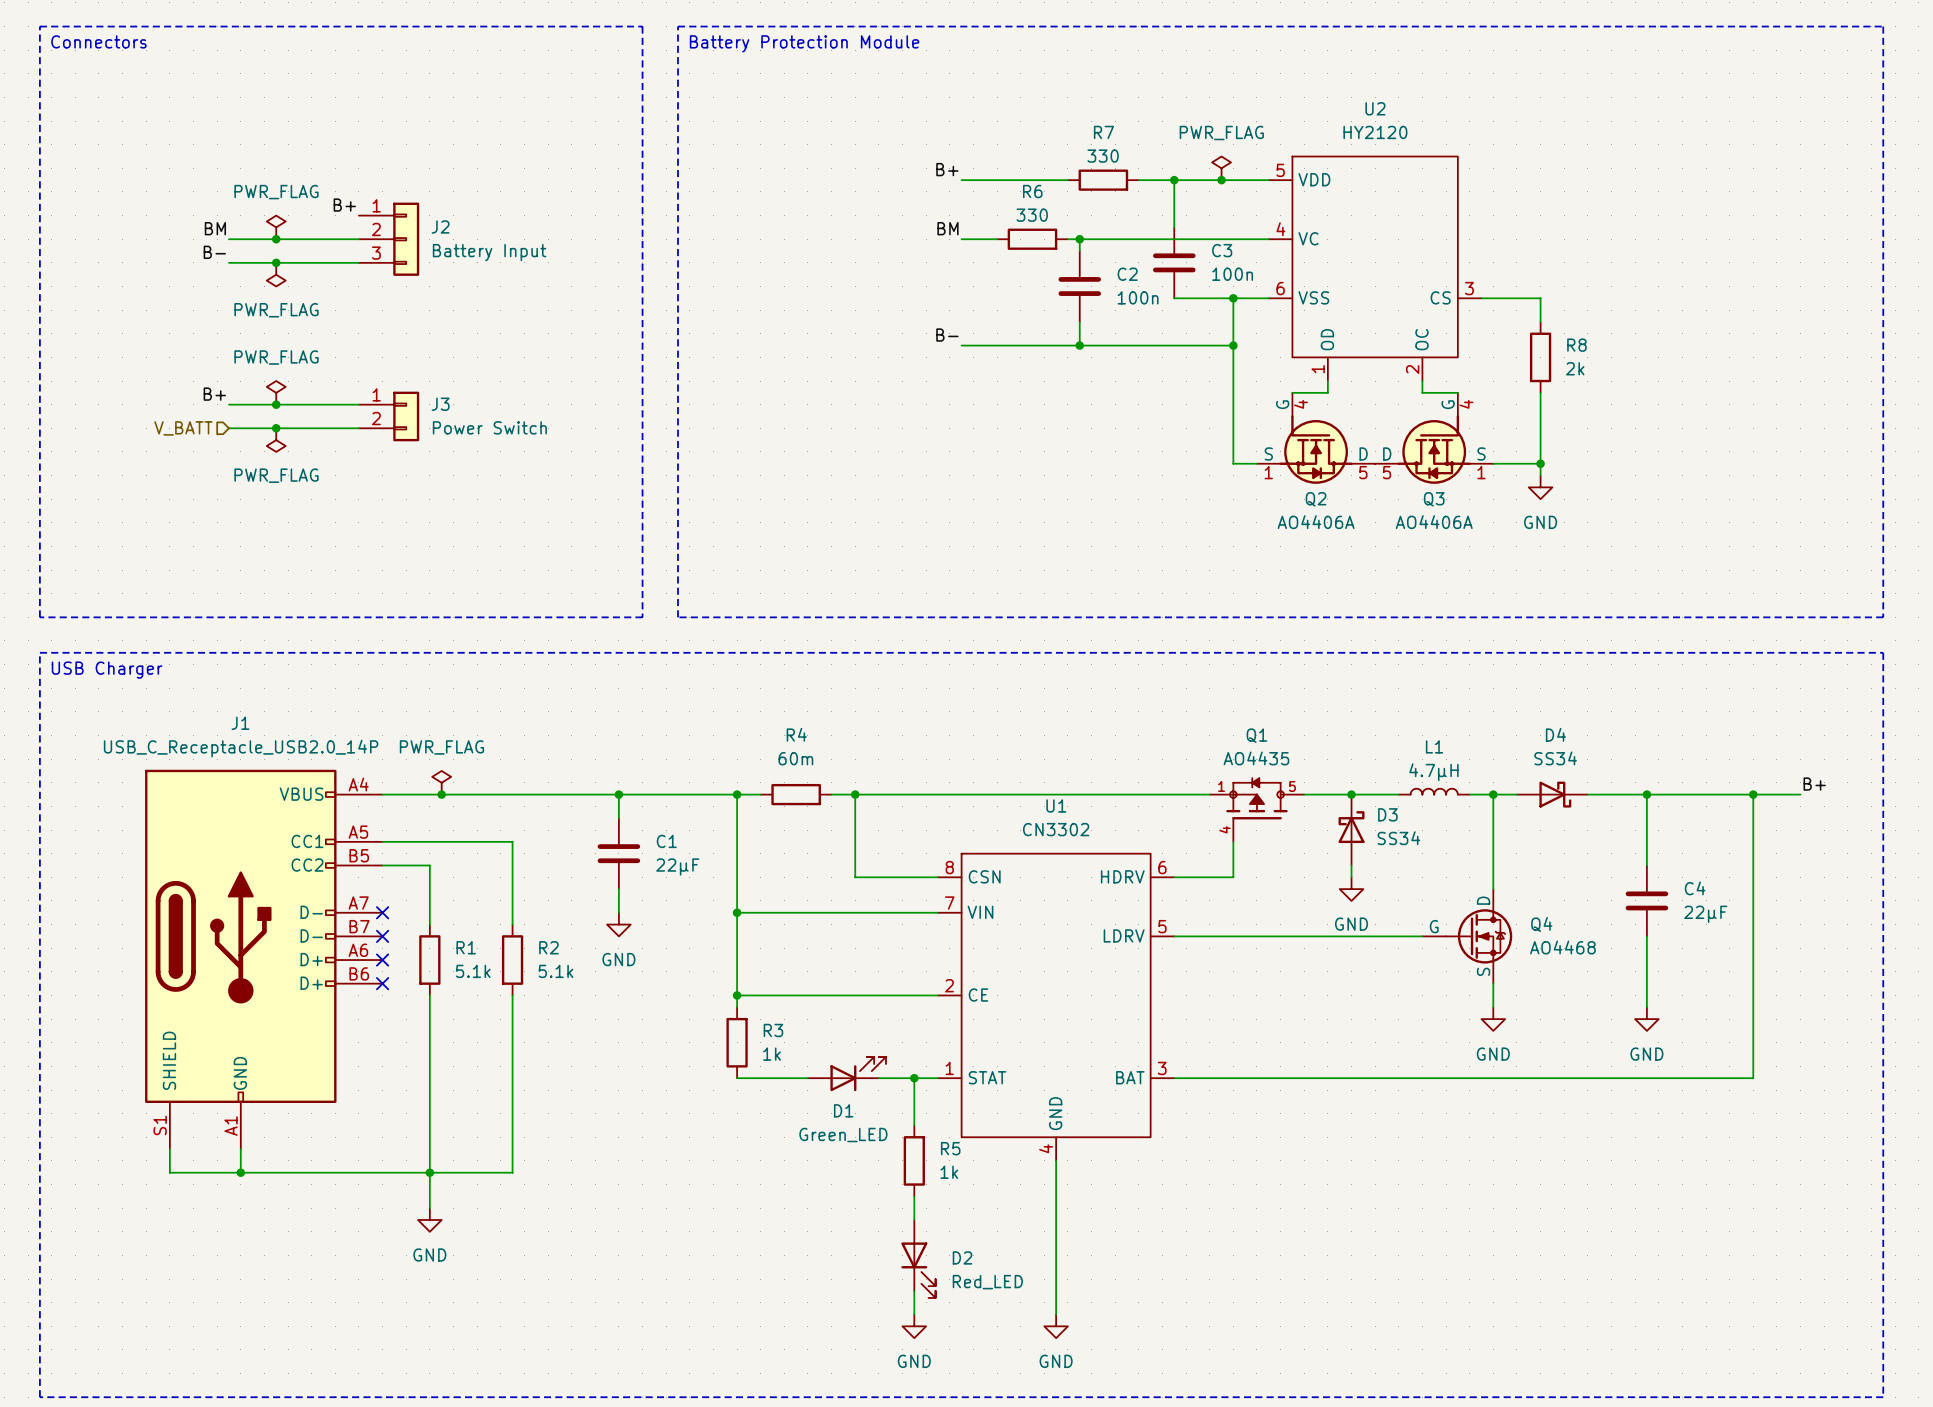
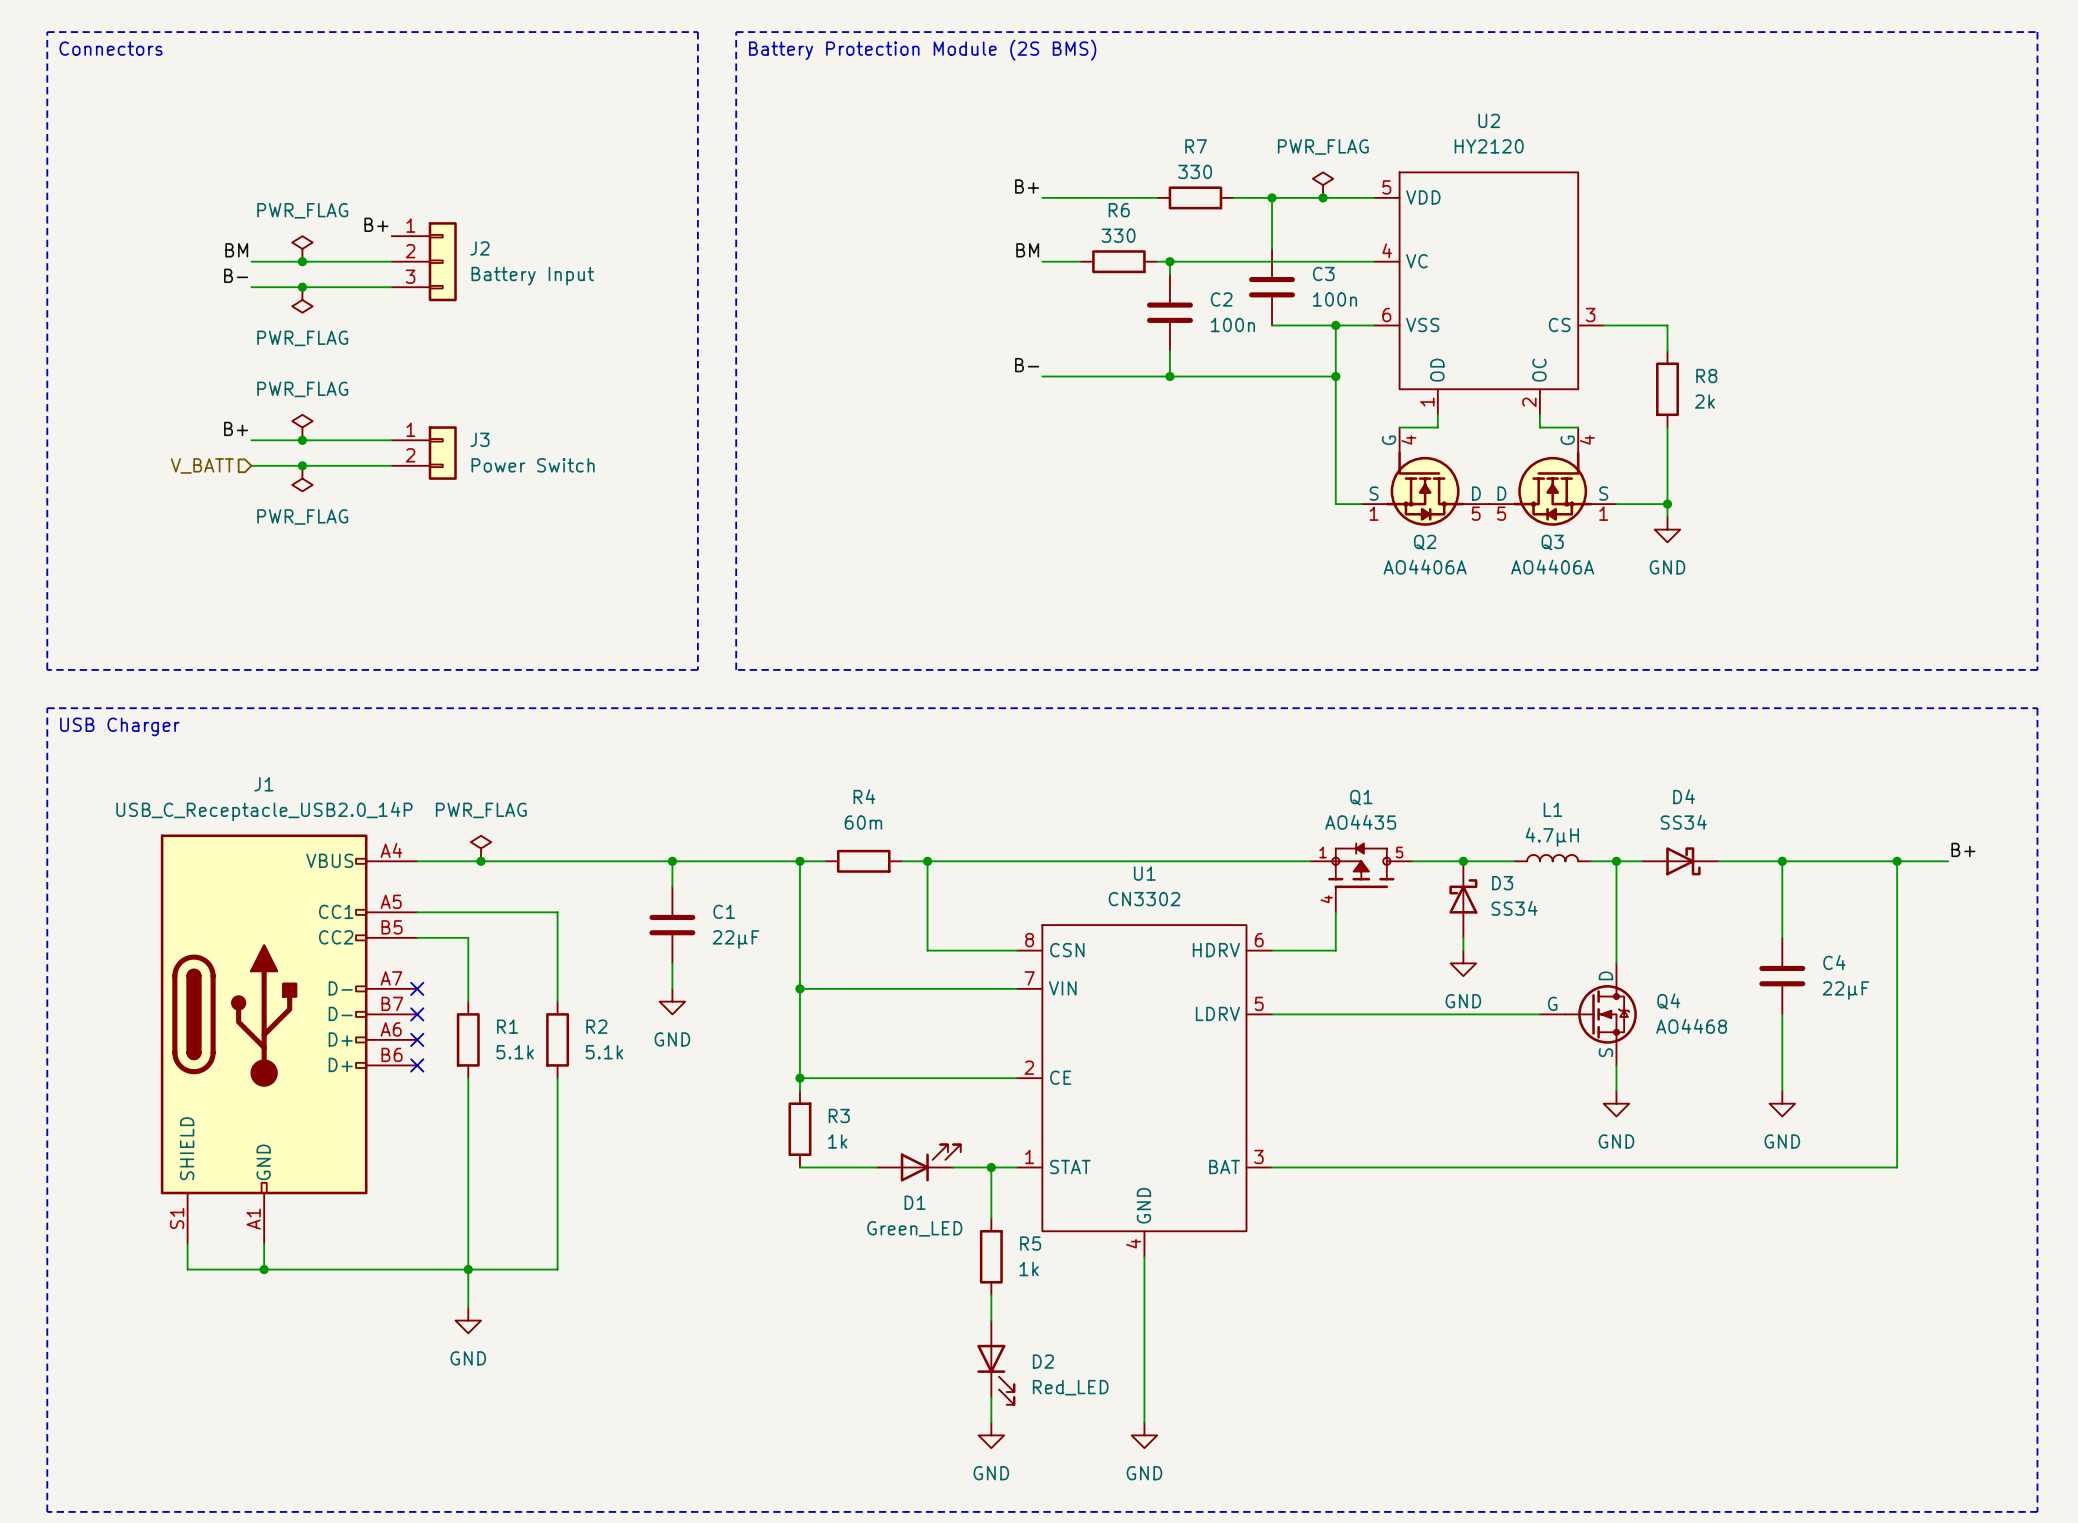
text: Battery Protection Module (804, 43) -> Battery Protection Module (2S BMS) (922, 50)

